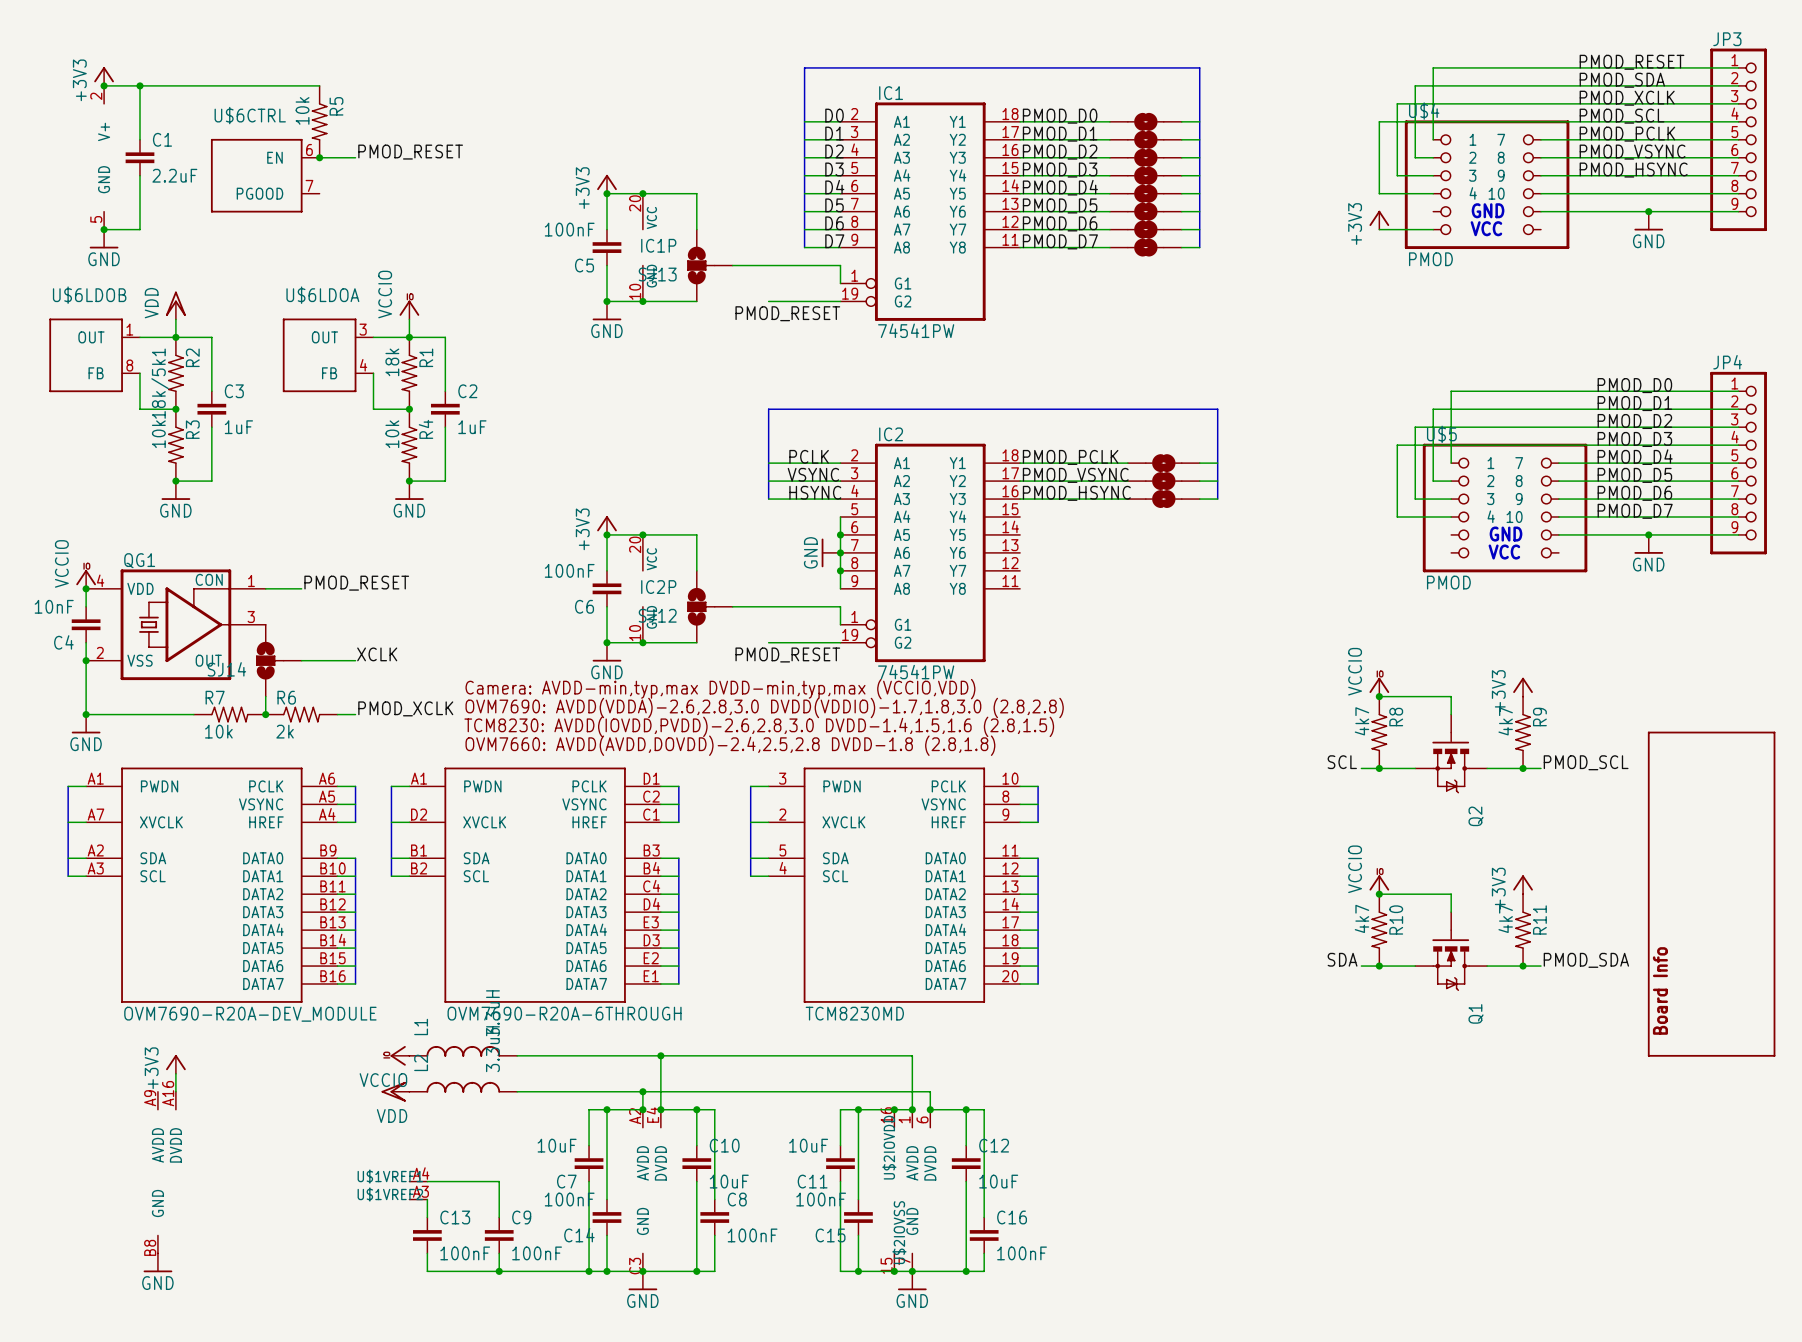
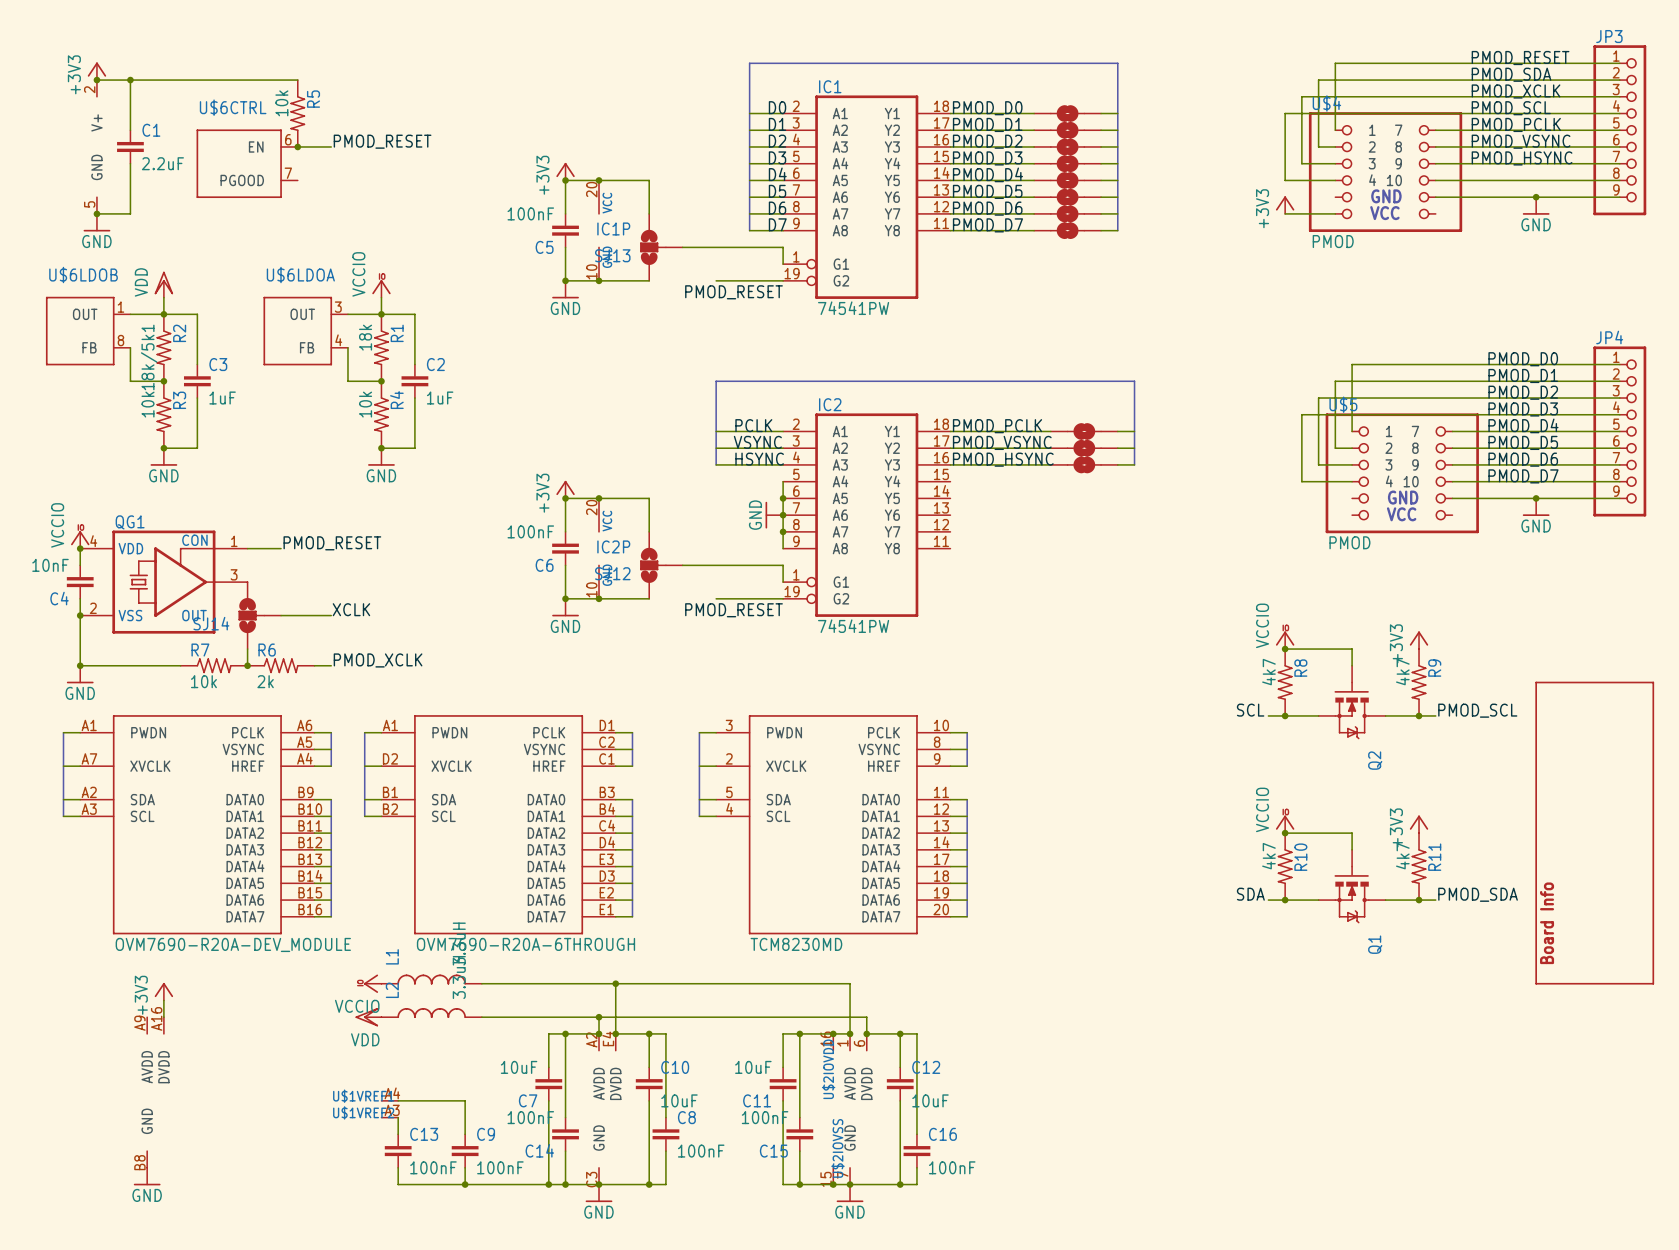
text: Camera: AVDD-min,typ,max DVDD-min,typ,max (VCCIO,VDD) (720, 689) -> none
text: OVM7690: AVDD(VDDA)-2.6,2.8,3.0 DVDD(VDDIO)-1.7,1.8,3.0 (2.8,2.8) (764, 707) -> none
text: TCM8230: AVDD(IOVDD,PVDD)-2.6,2.8,3.0 DVDD-1.4,1.5,1.6 (2.8,1.5) (759, 726) -> none
text: OVM7660: AVDD(AVDD,DOVDD)-2.4,2.5,2.8 DVDD-1.8 (2.8,1.8) (730, 745) -> none

